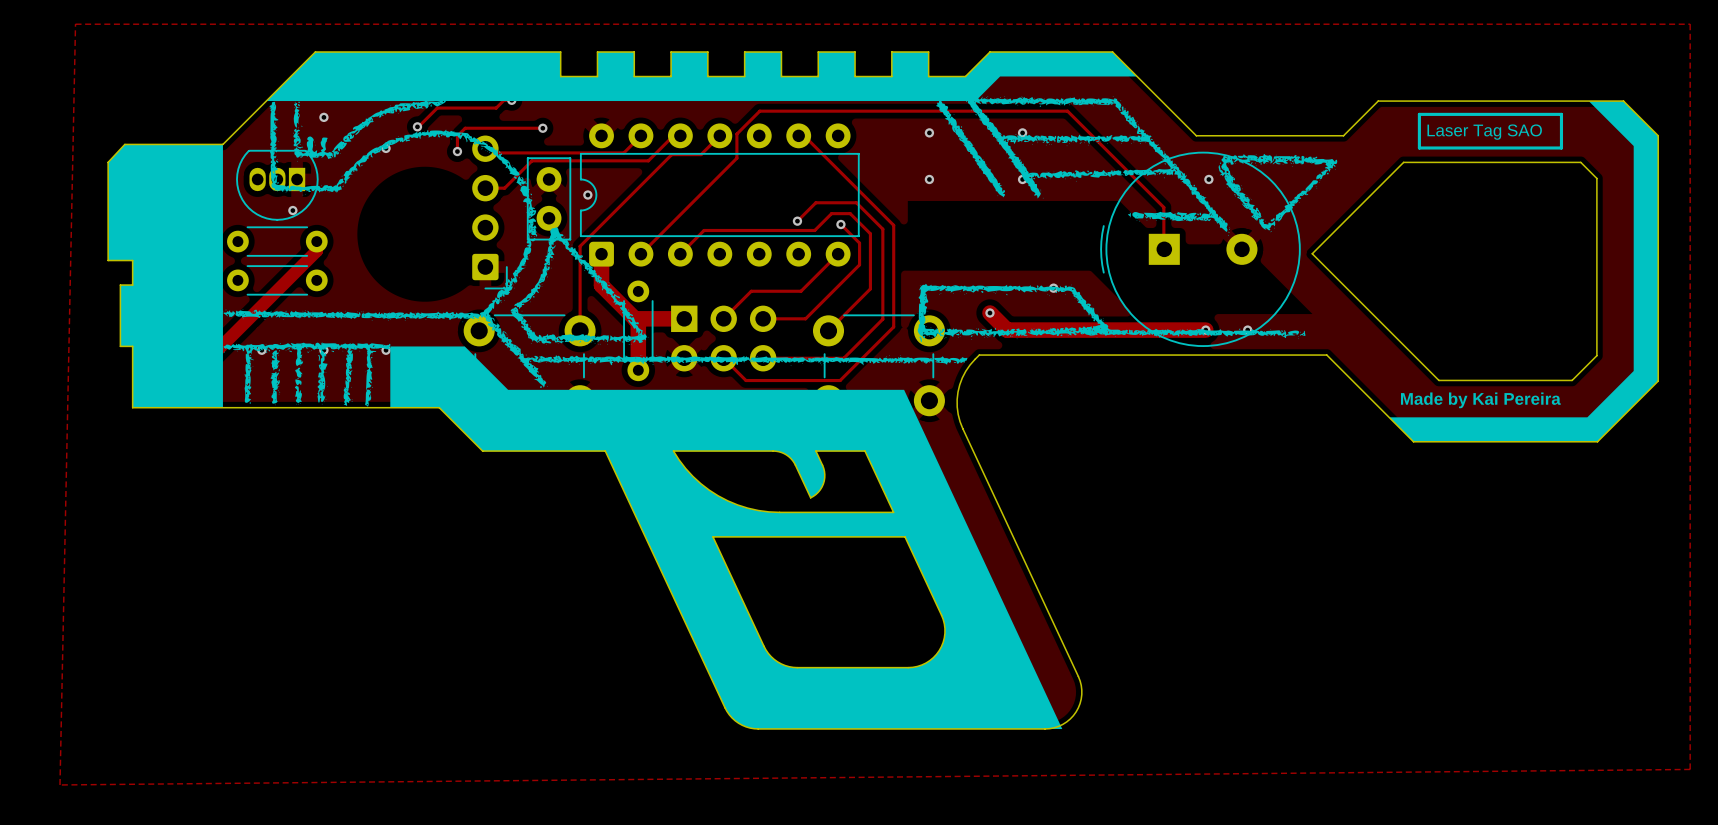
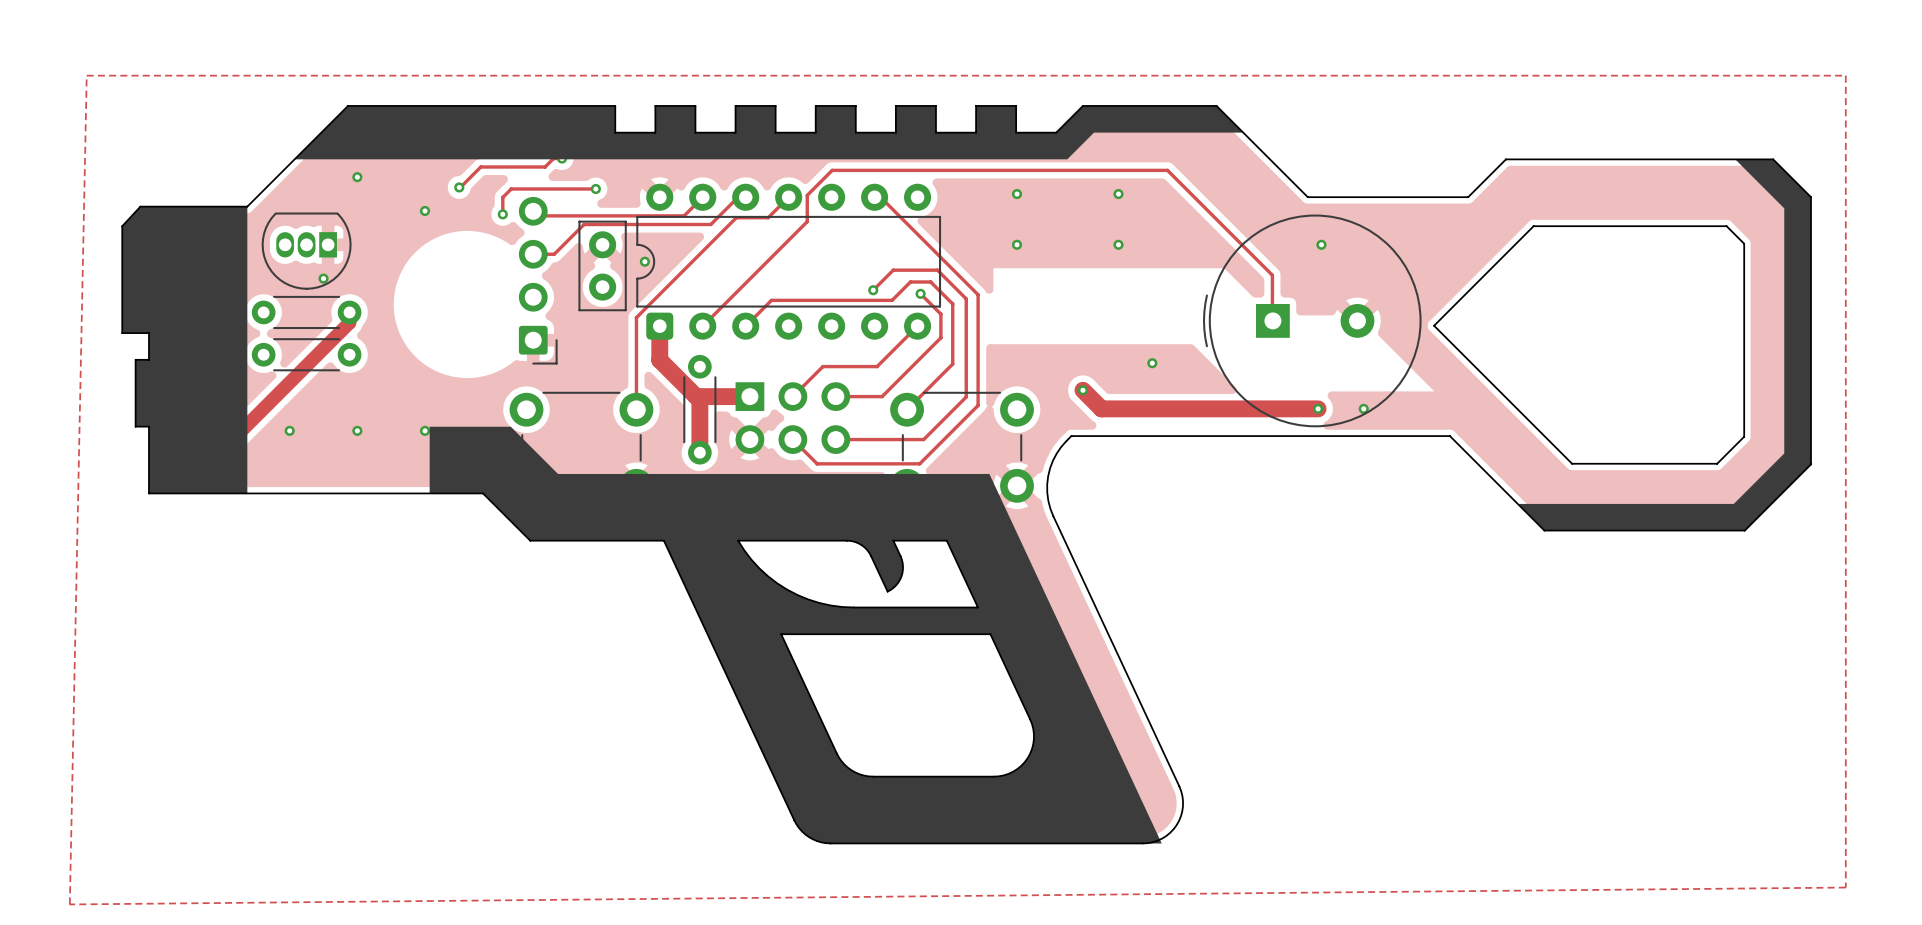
drawing: [222, 95, 1338, 408] -> none
line: (1419, 114) (1561, 114) (1561, 148) (1419, 148) (1419, 114) -> none
text: Laser Tag SAO (1484, 132) -> none
text: Made by Kai Pereira (1480, 400) -> none

